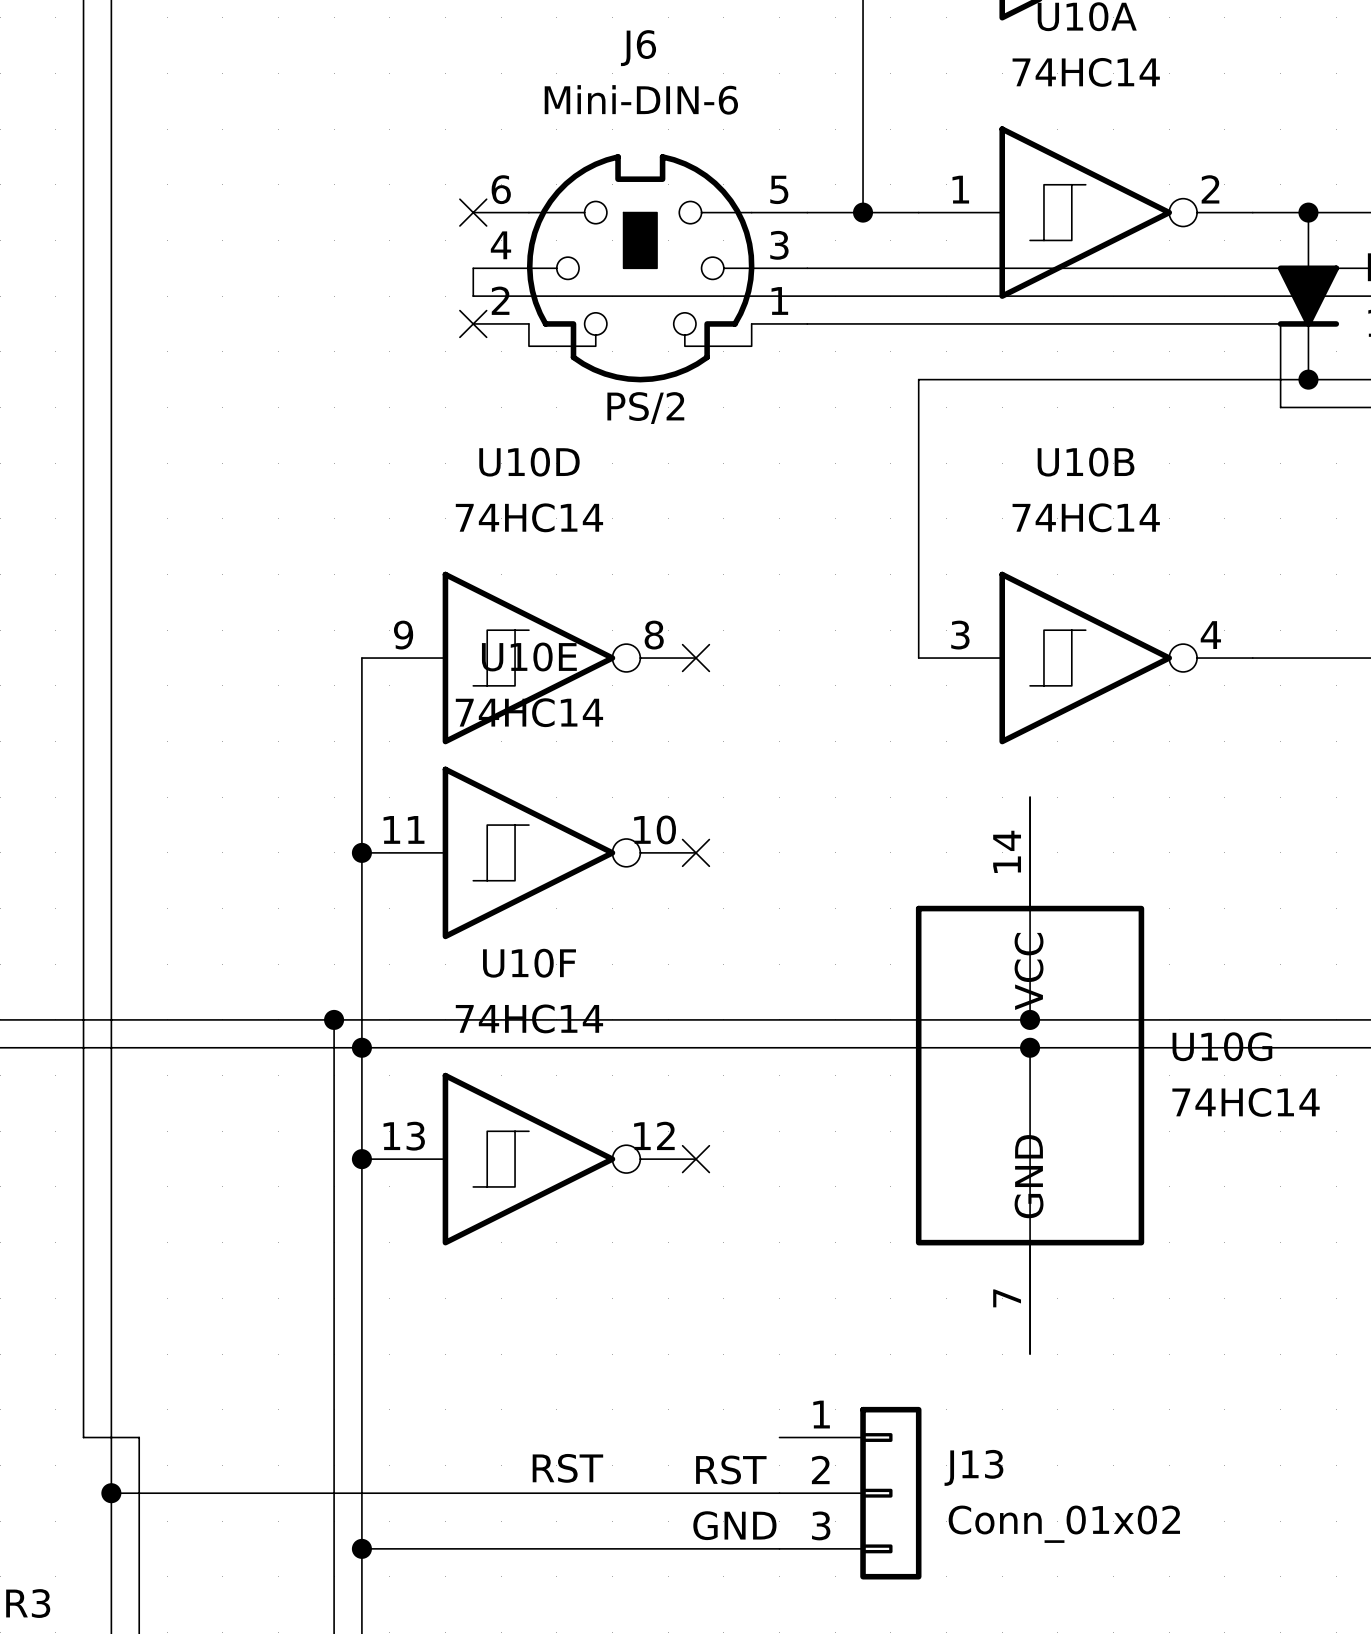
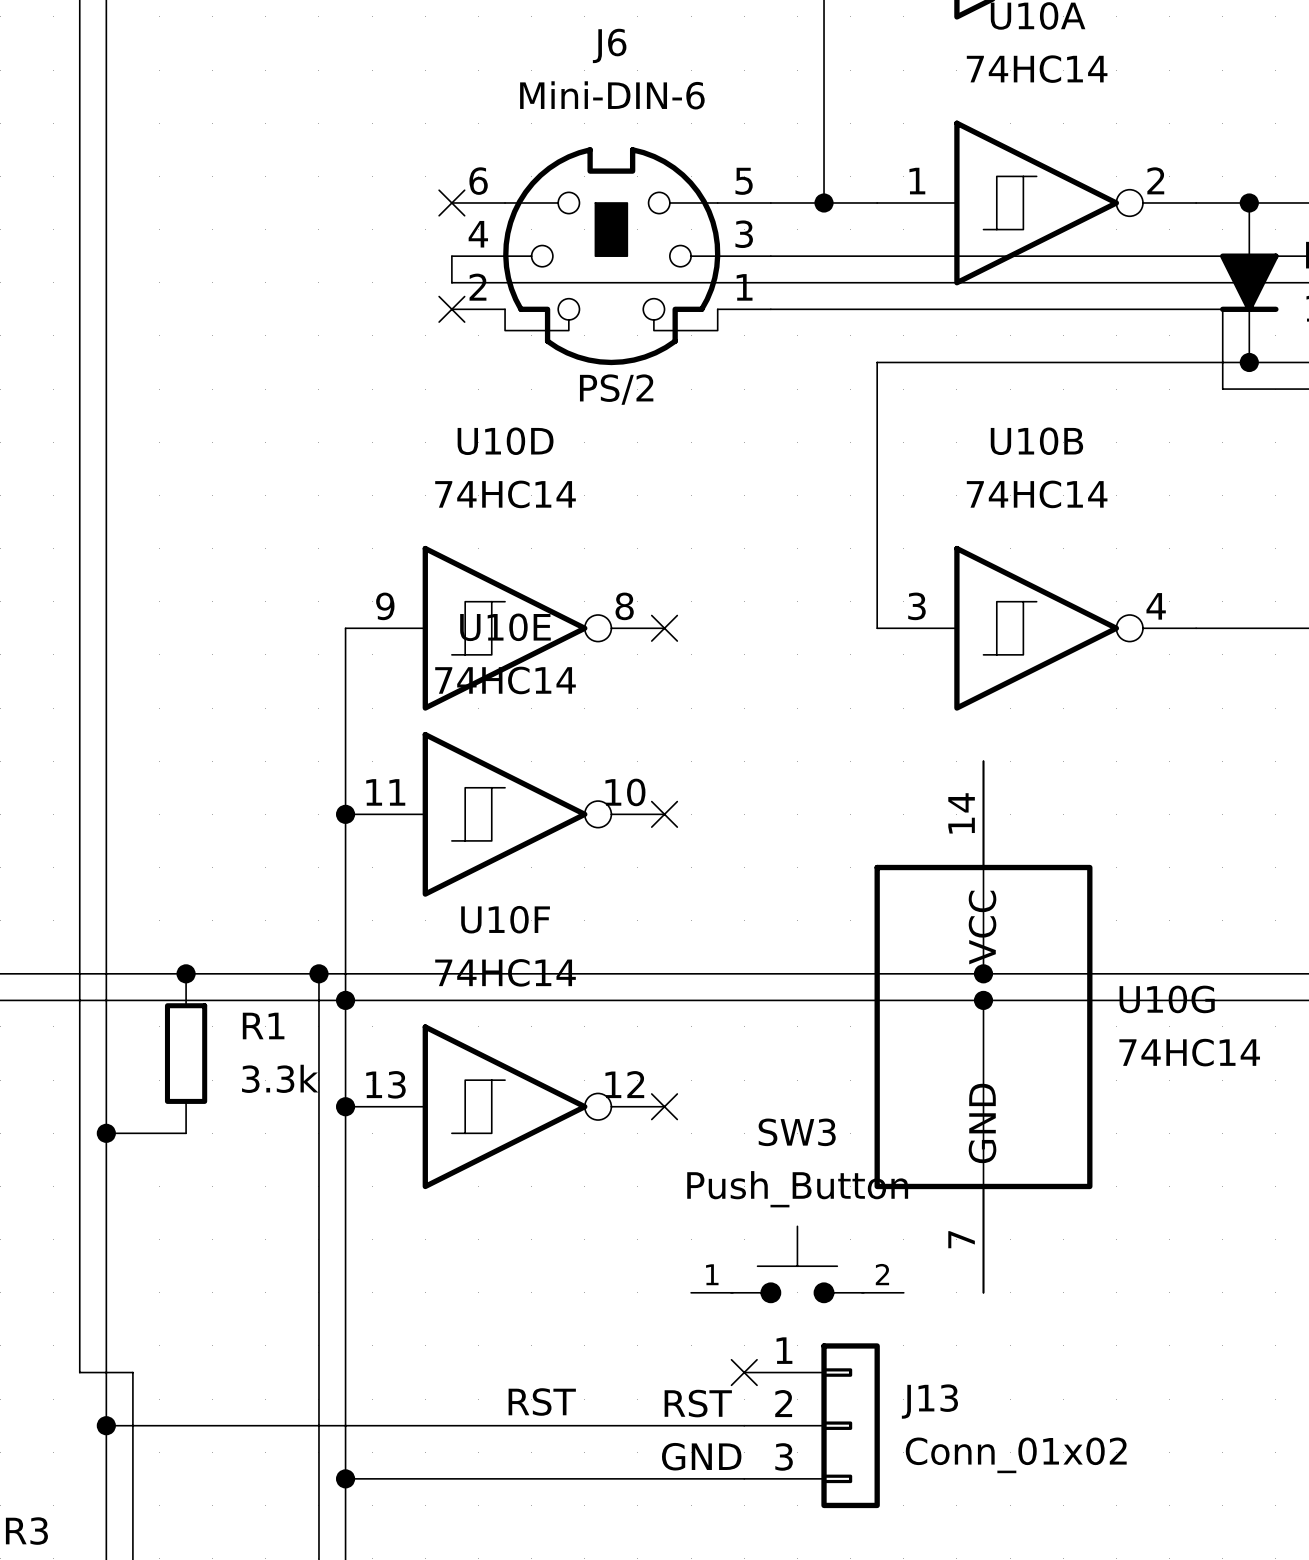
junction: none -> (186, 973)
R1: none -> 3.3k (186, 1053)
wire: none -> (106, 1133) (186, 1133)
junction: none -> (106, 1133)
SW3: none -> Push_Button (797, 1264)
no-connect mark: none -> (744, 1372)

